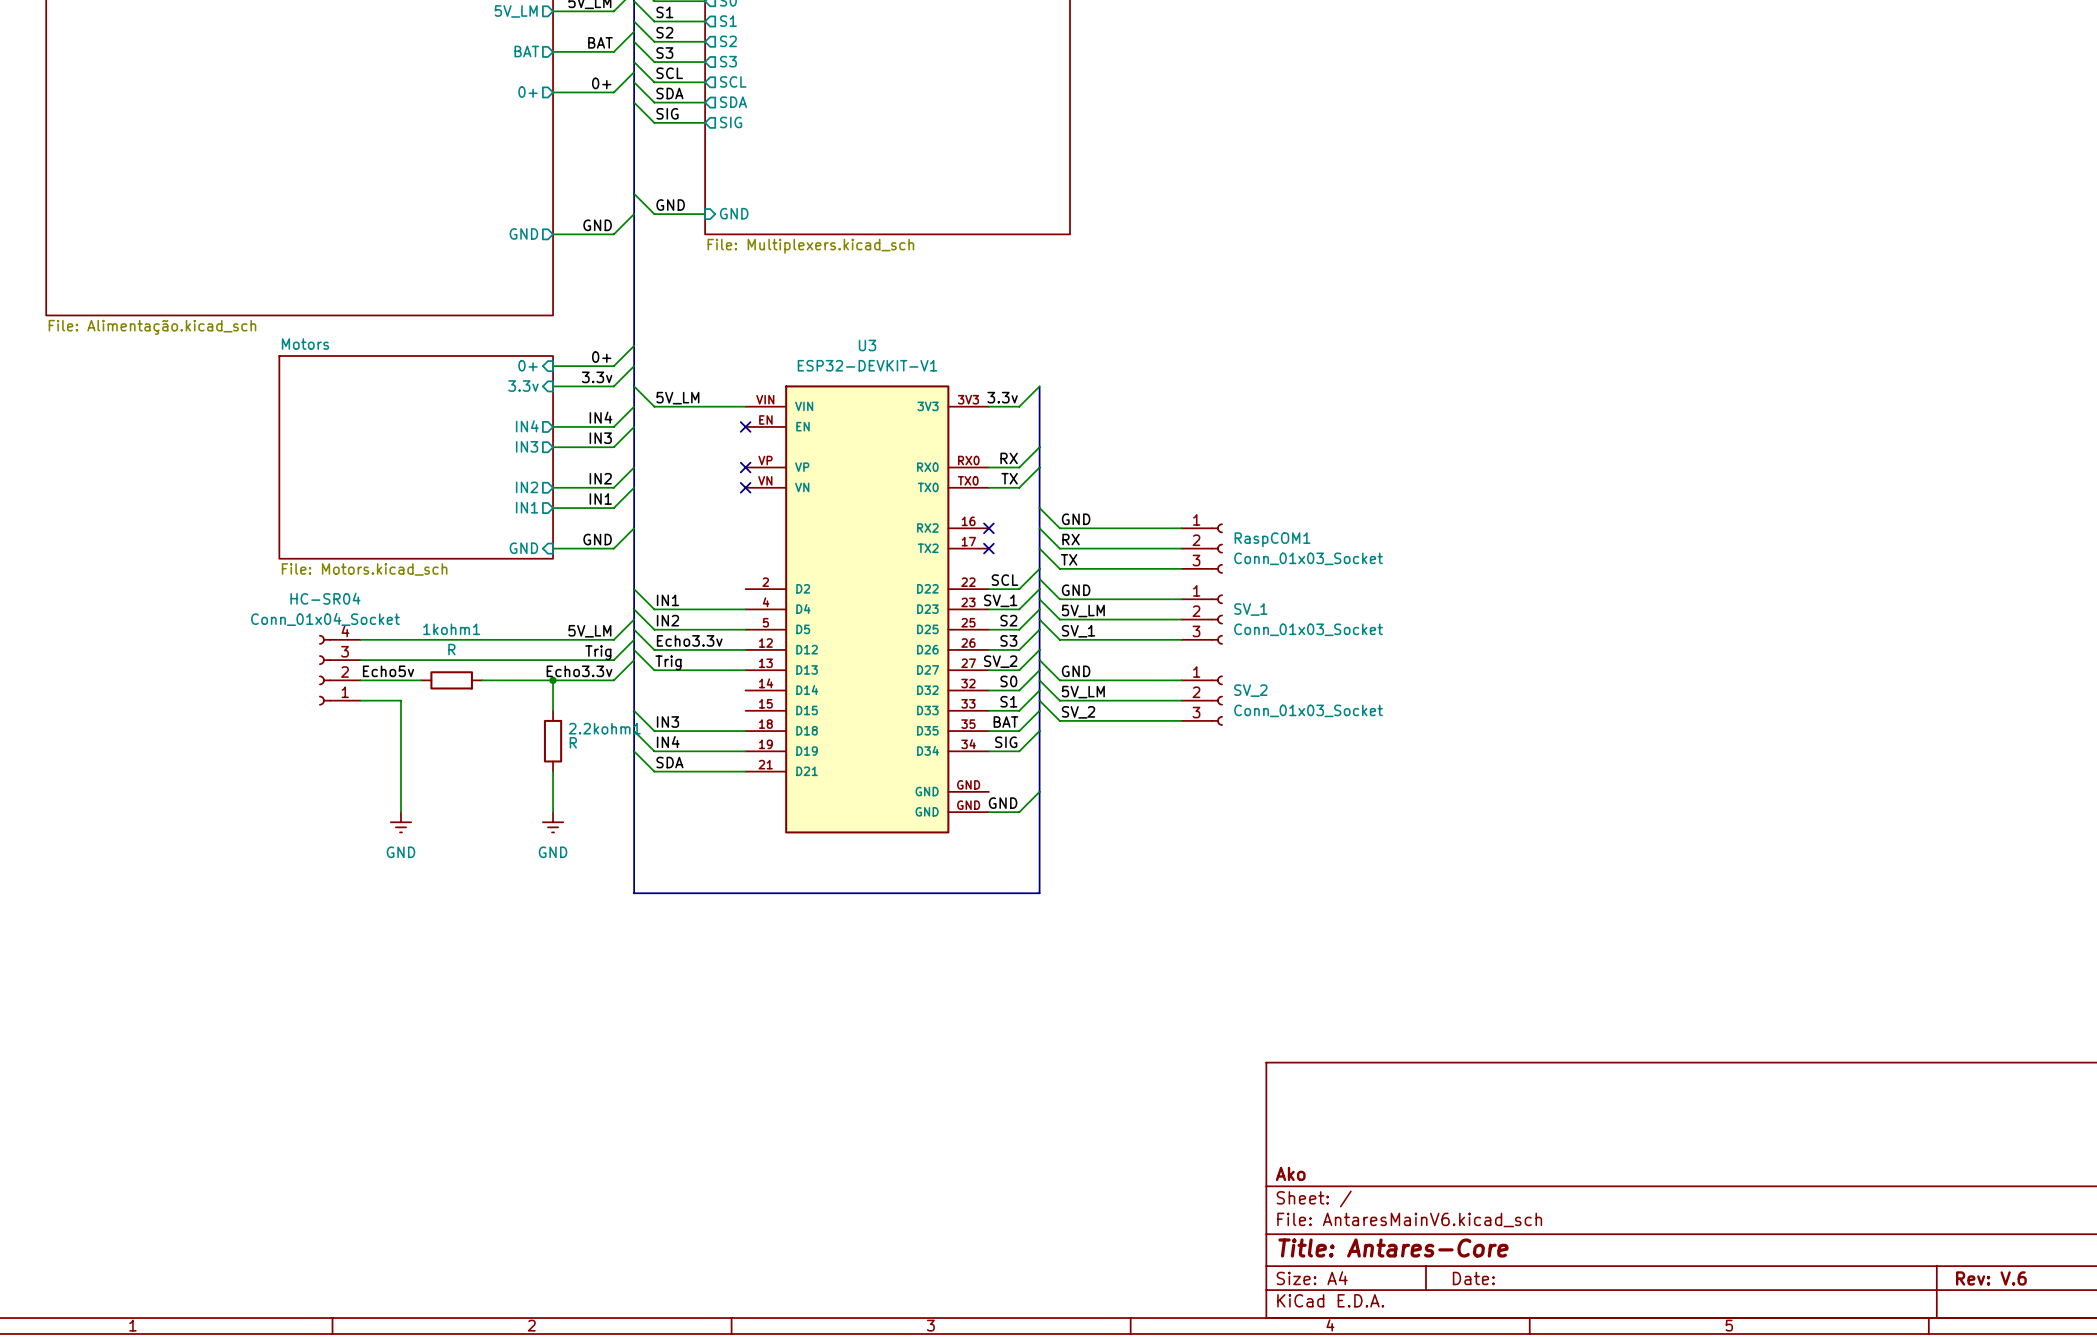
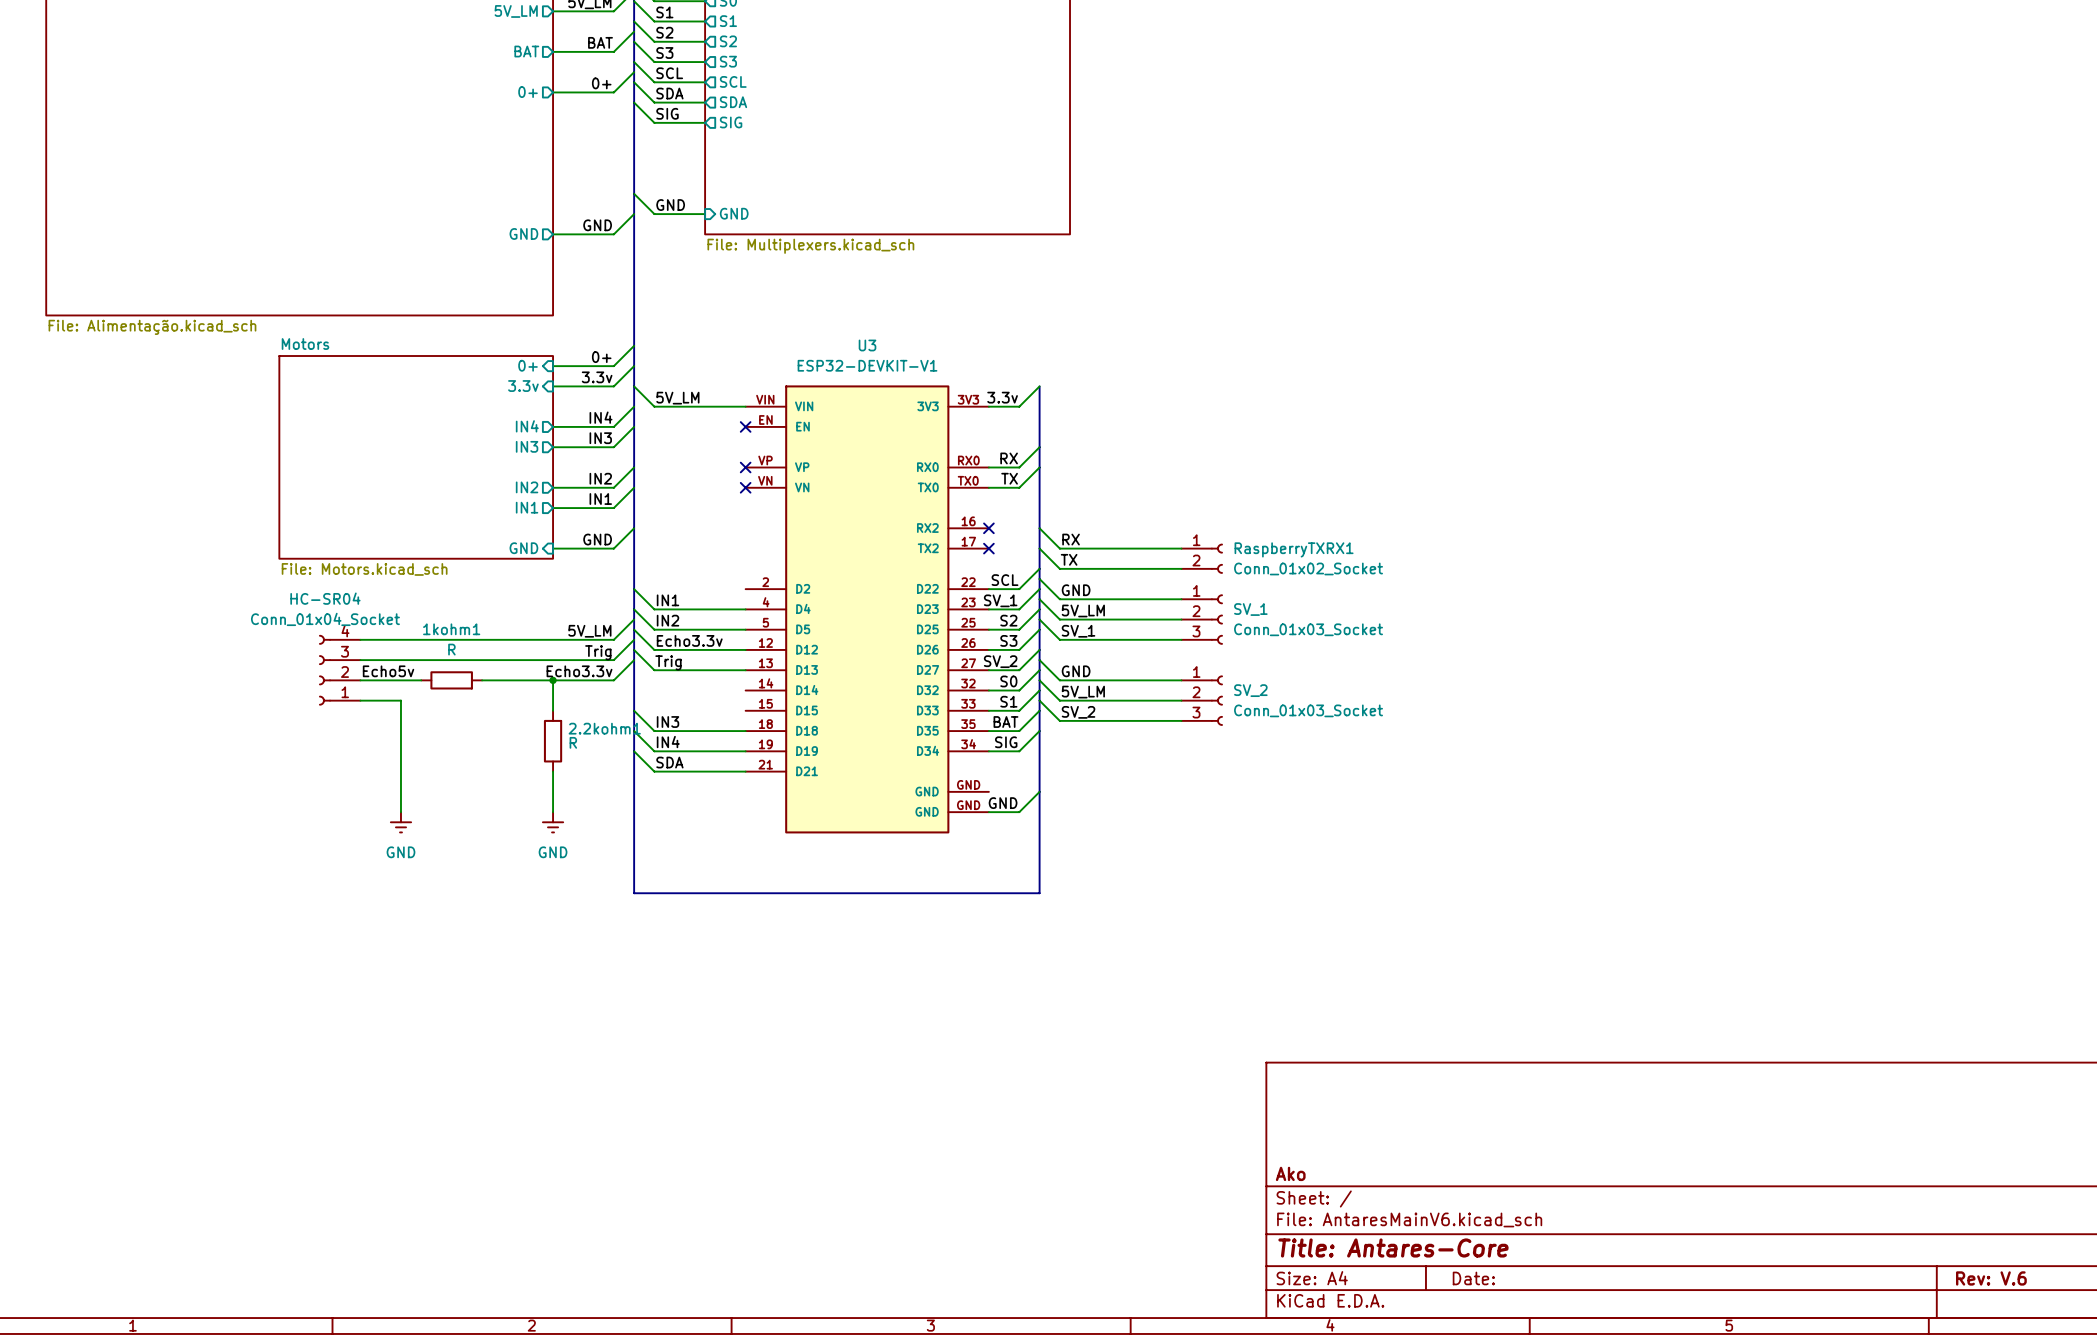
wire: (1039, 508) (1059, 528) (1181, 528) -> none
label: GND (1076, 519) -> none
RaspCOM1: Conn_01x03_Socket (1202, 548) -> none
RaspberryTXRX1: none -> Conn_01x02_Socket (1202, 558)

